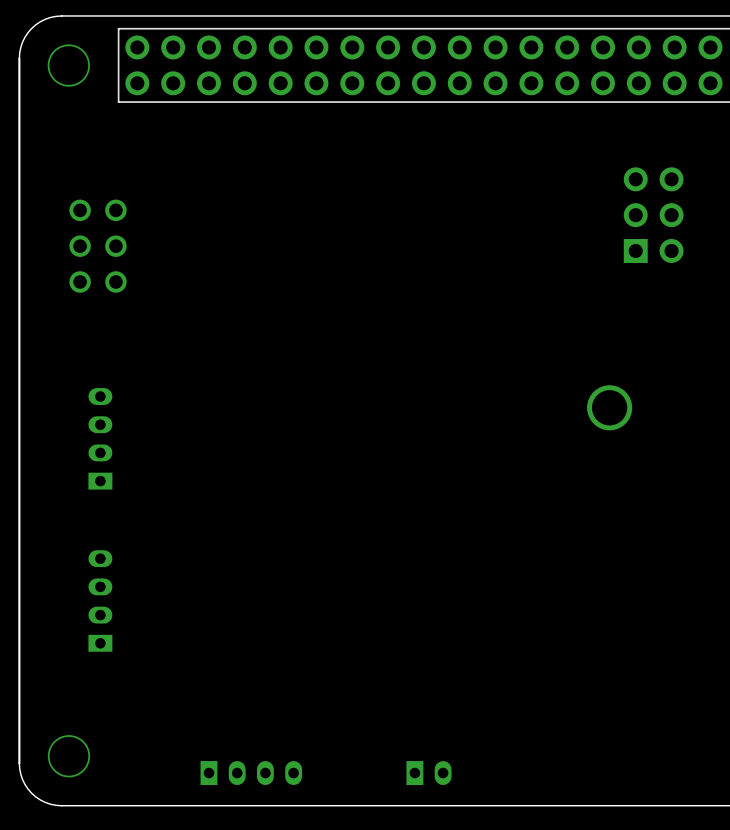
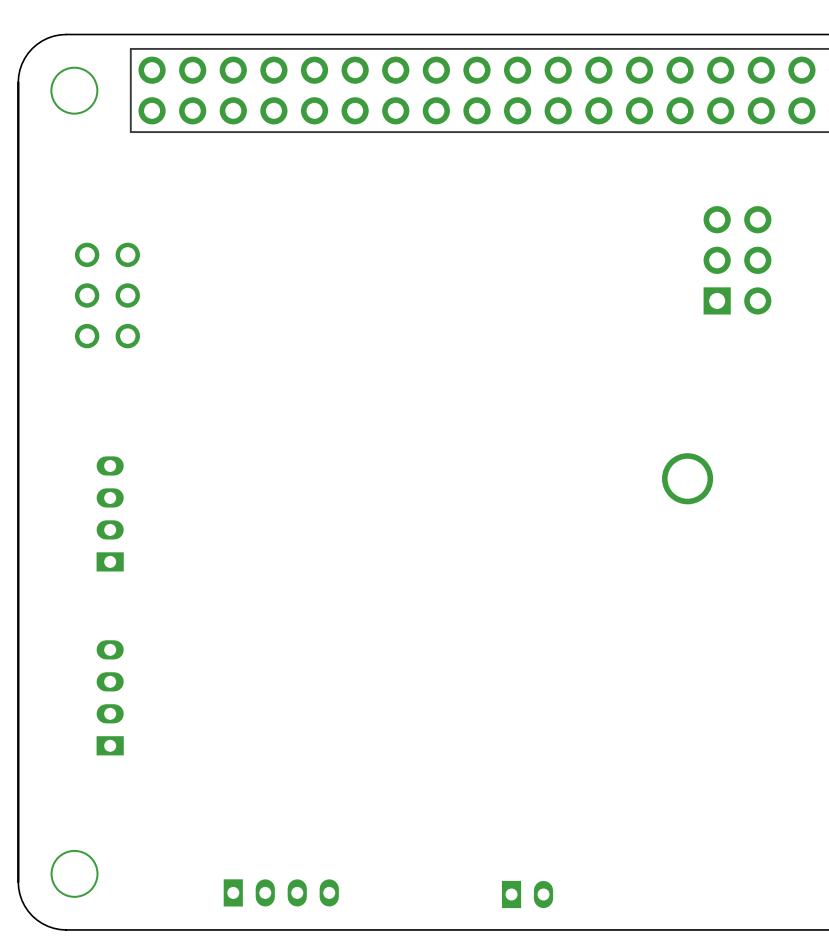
part position: (429, 773) -> (527, 894)

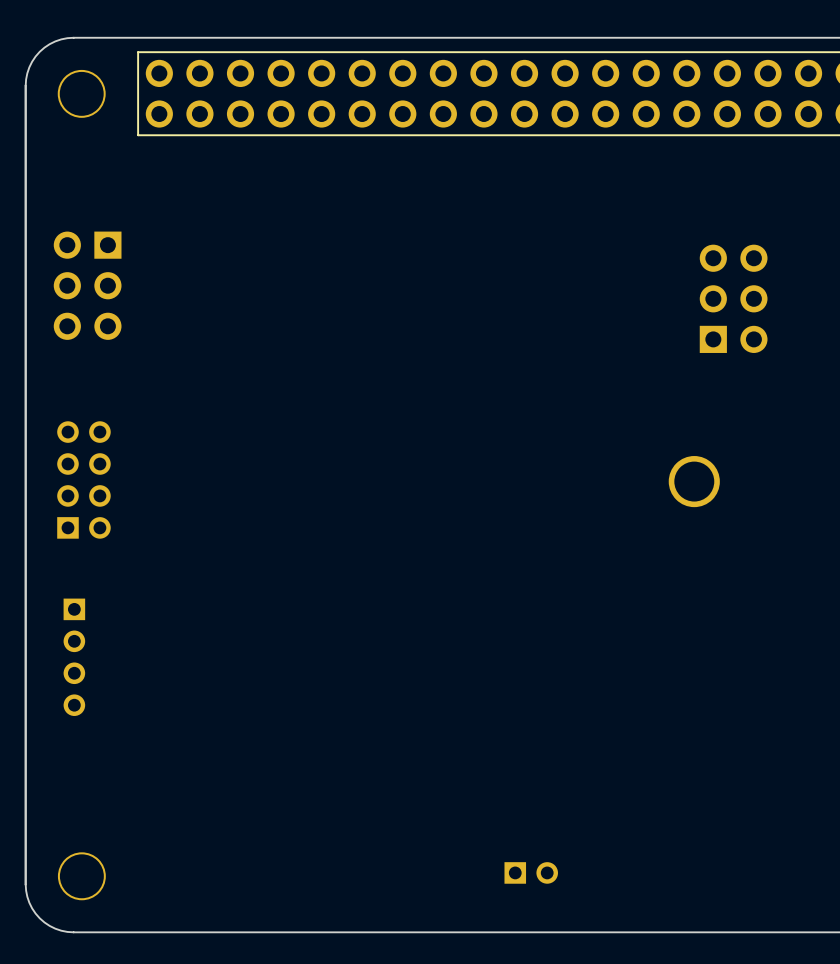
part position: (737, 260) -> (733, 298)
part: none -> (87, 285)
part: (107, 295) -> none
part: none -> (83, 479)
part: (110, 513) -> none
part: none -> (74, 657)
part: (110, 697) -> none
part: none -> (531, 872)
part: (281, 892) -> none
part: (527, 894) -> none

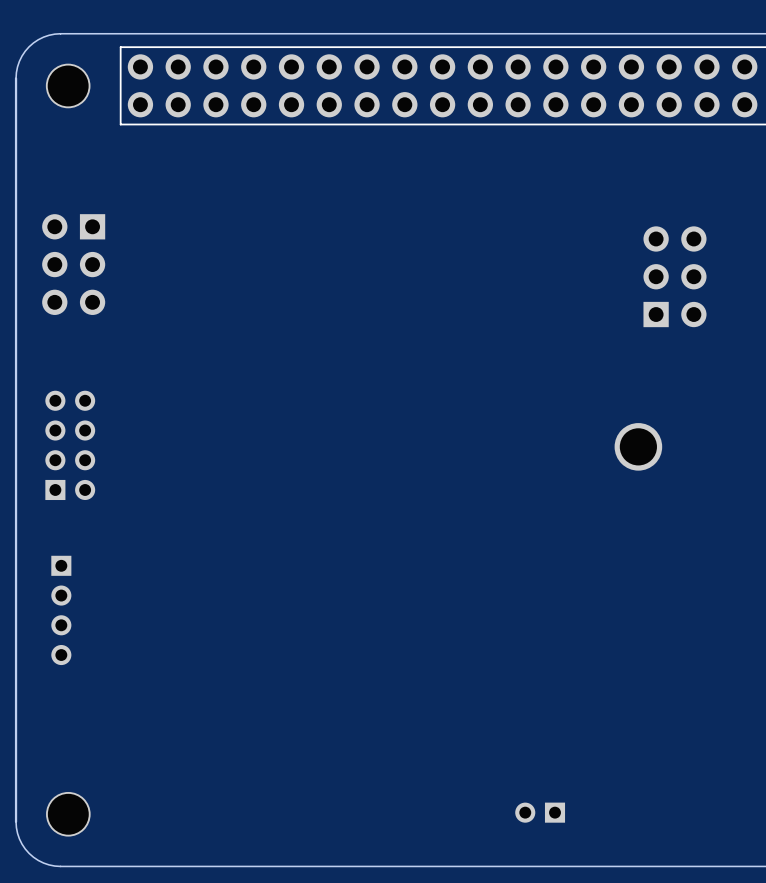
part rotation: 0° (531, 872) -> 180° (540, 812)
part position: (531, 872) -> (540, 812)

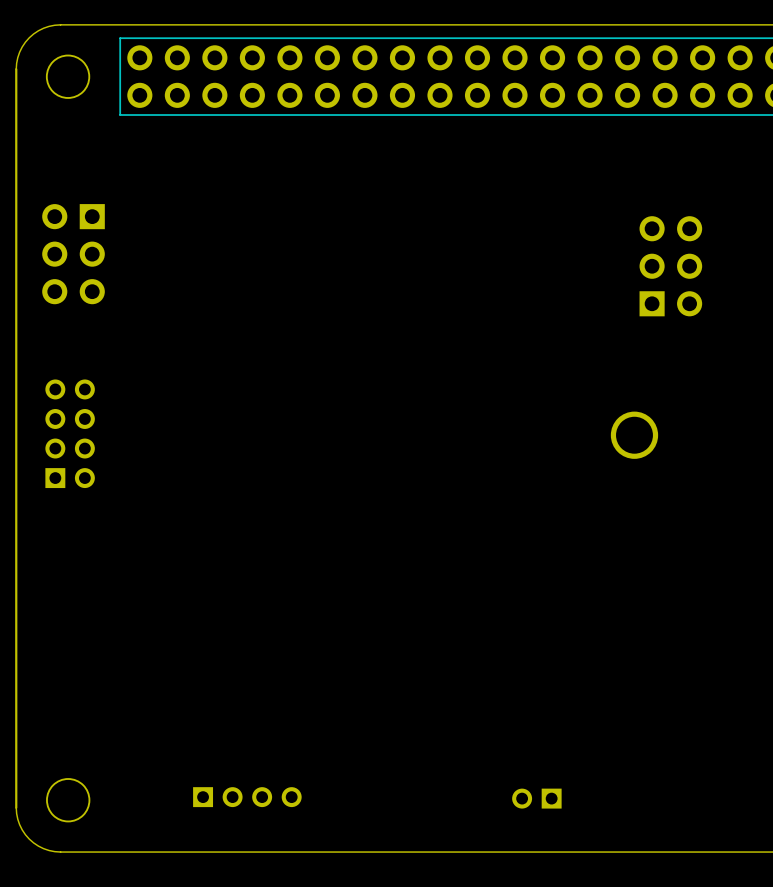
part rotation: 0° (61, 610) -> 90° counterclockwise (247, 797)
part position: (61, 610) -> (247, 797)

